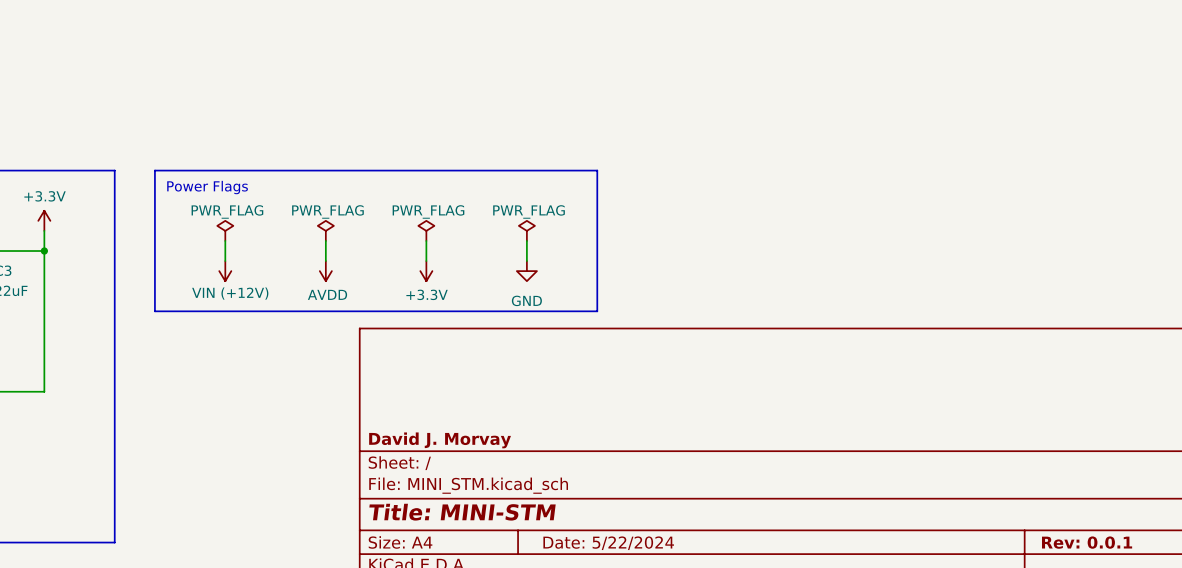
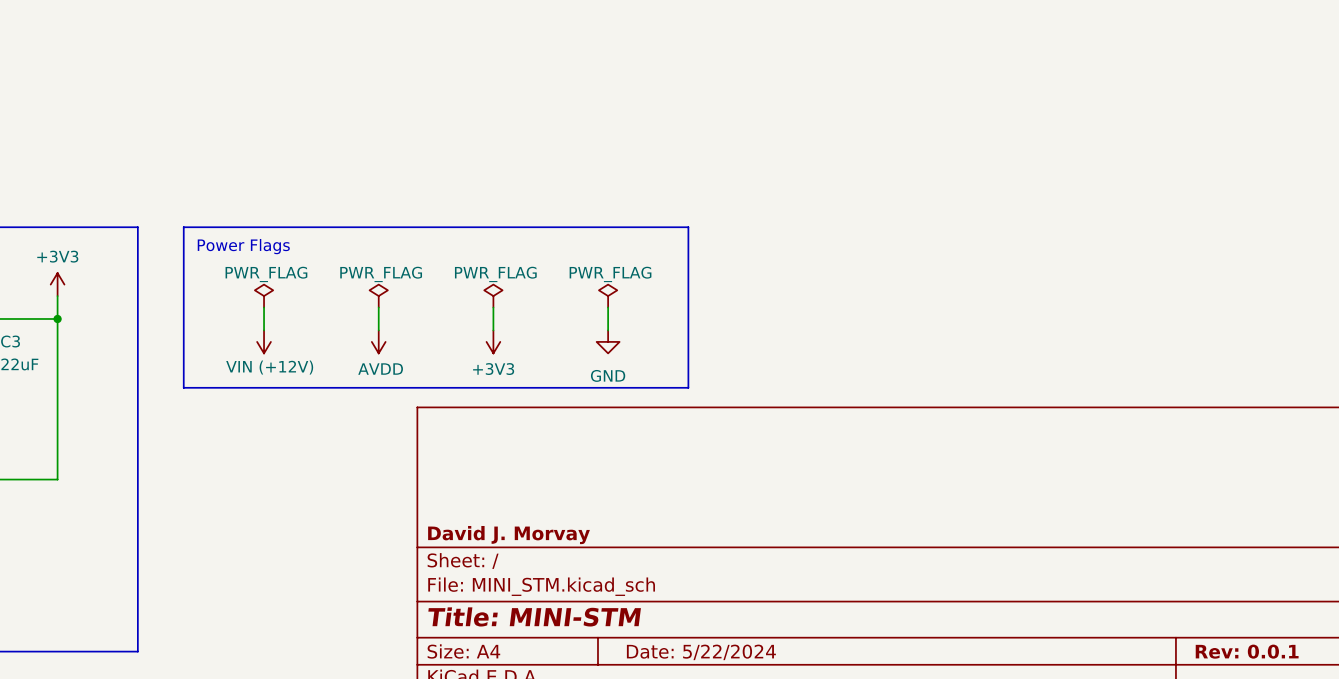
power symbol: +3.3V (44, 220) -> +3V3 (57, 284)
power symbol: +3.3V (426, 271) -> +3V3 (493, 341)

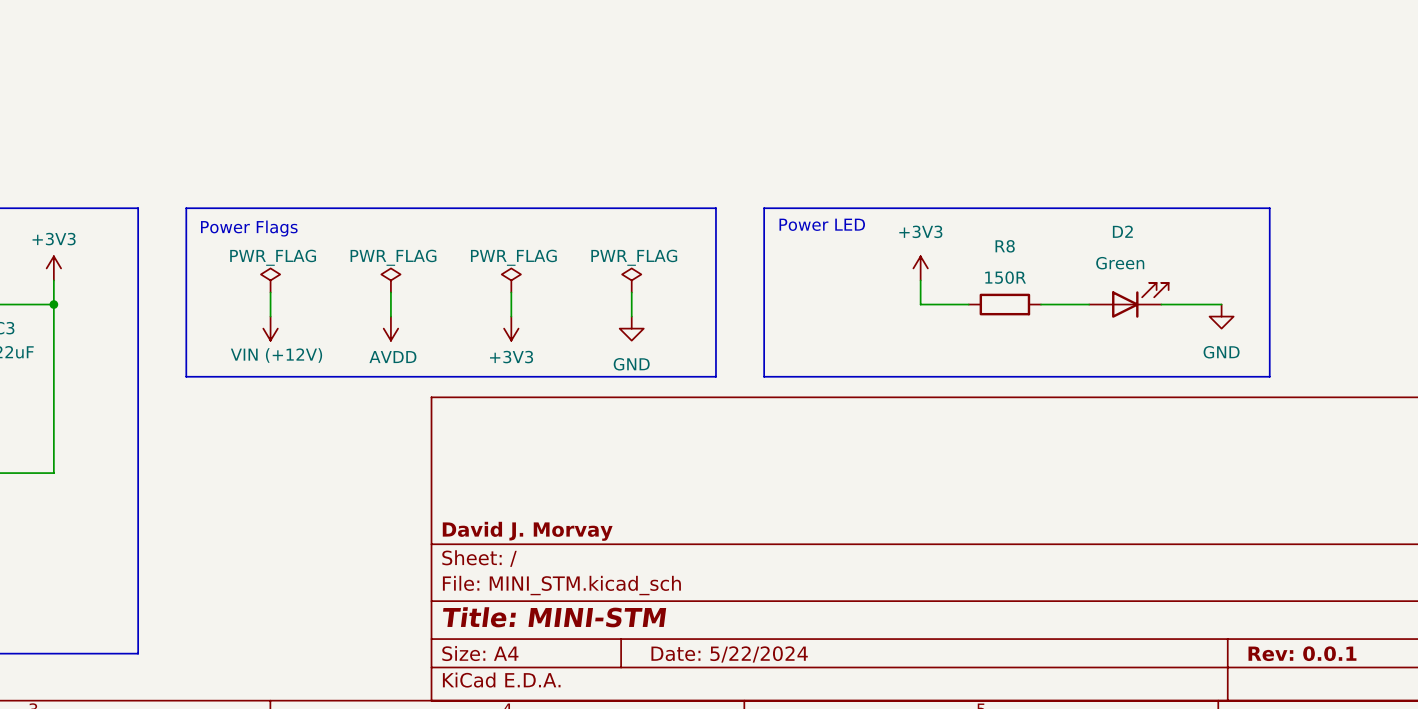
line: none -> (764, 208) (1269, 208) (1269, 376) (764, 376) (764, 208)
text: none -> Power LED (822, 224)
power symbol: none -> +3V3 (920, 268)
wire: none -> (920, 280) (920, 304) (968, 304)
D2: none -> Green (1128, 300)
R8: none -> 150R (1004, 304)
wire: none -> (1041, 304) (1089, 304)
wire: none -> (1161, 304) (1221, 304)
power symbol: none -> GND (1221, 316)

